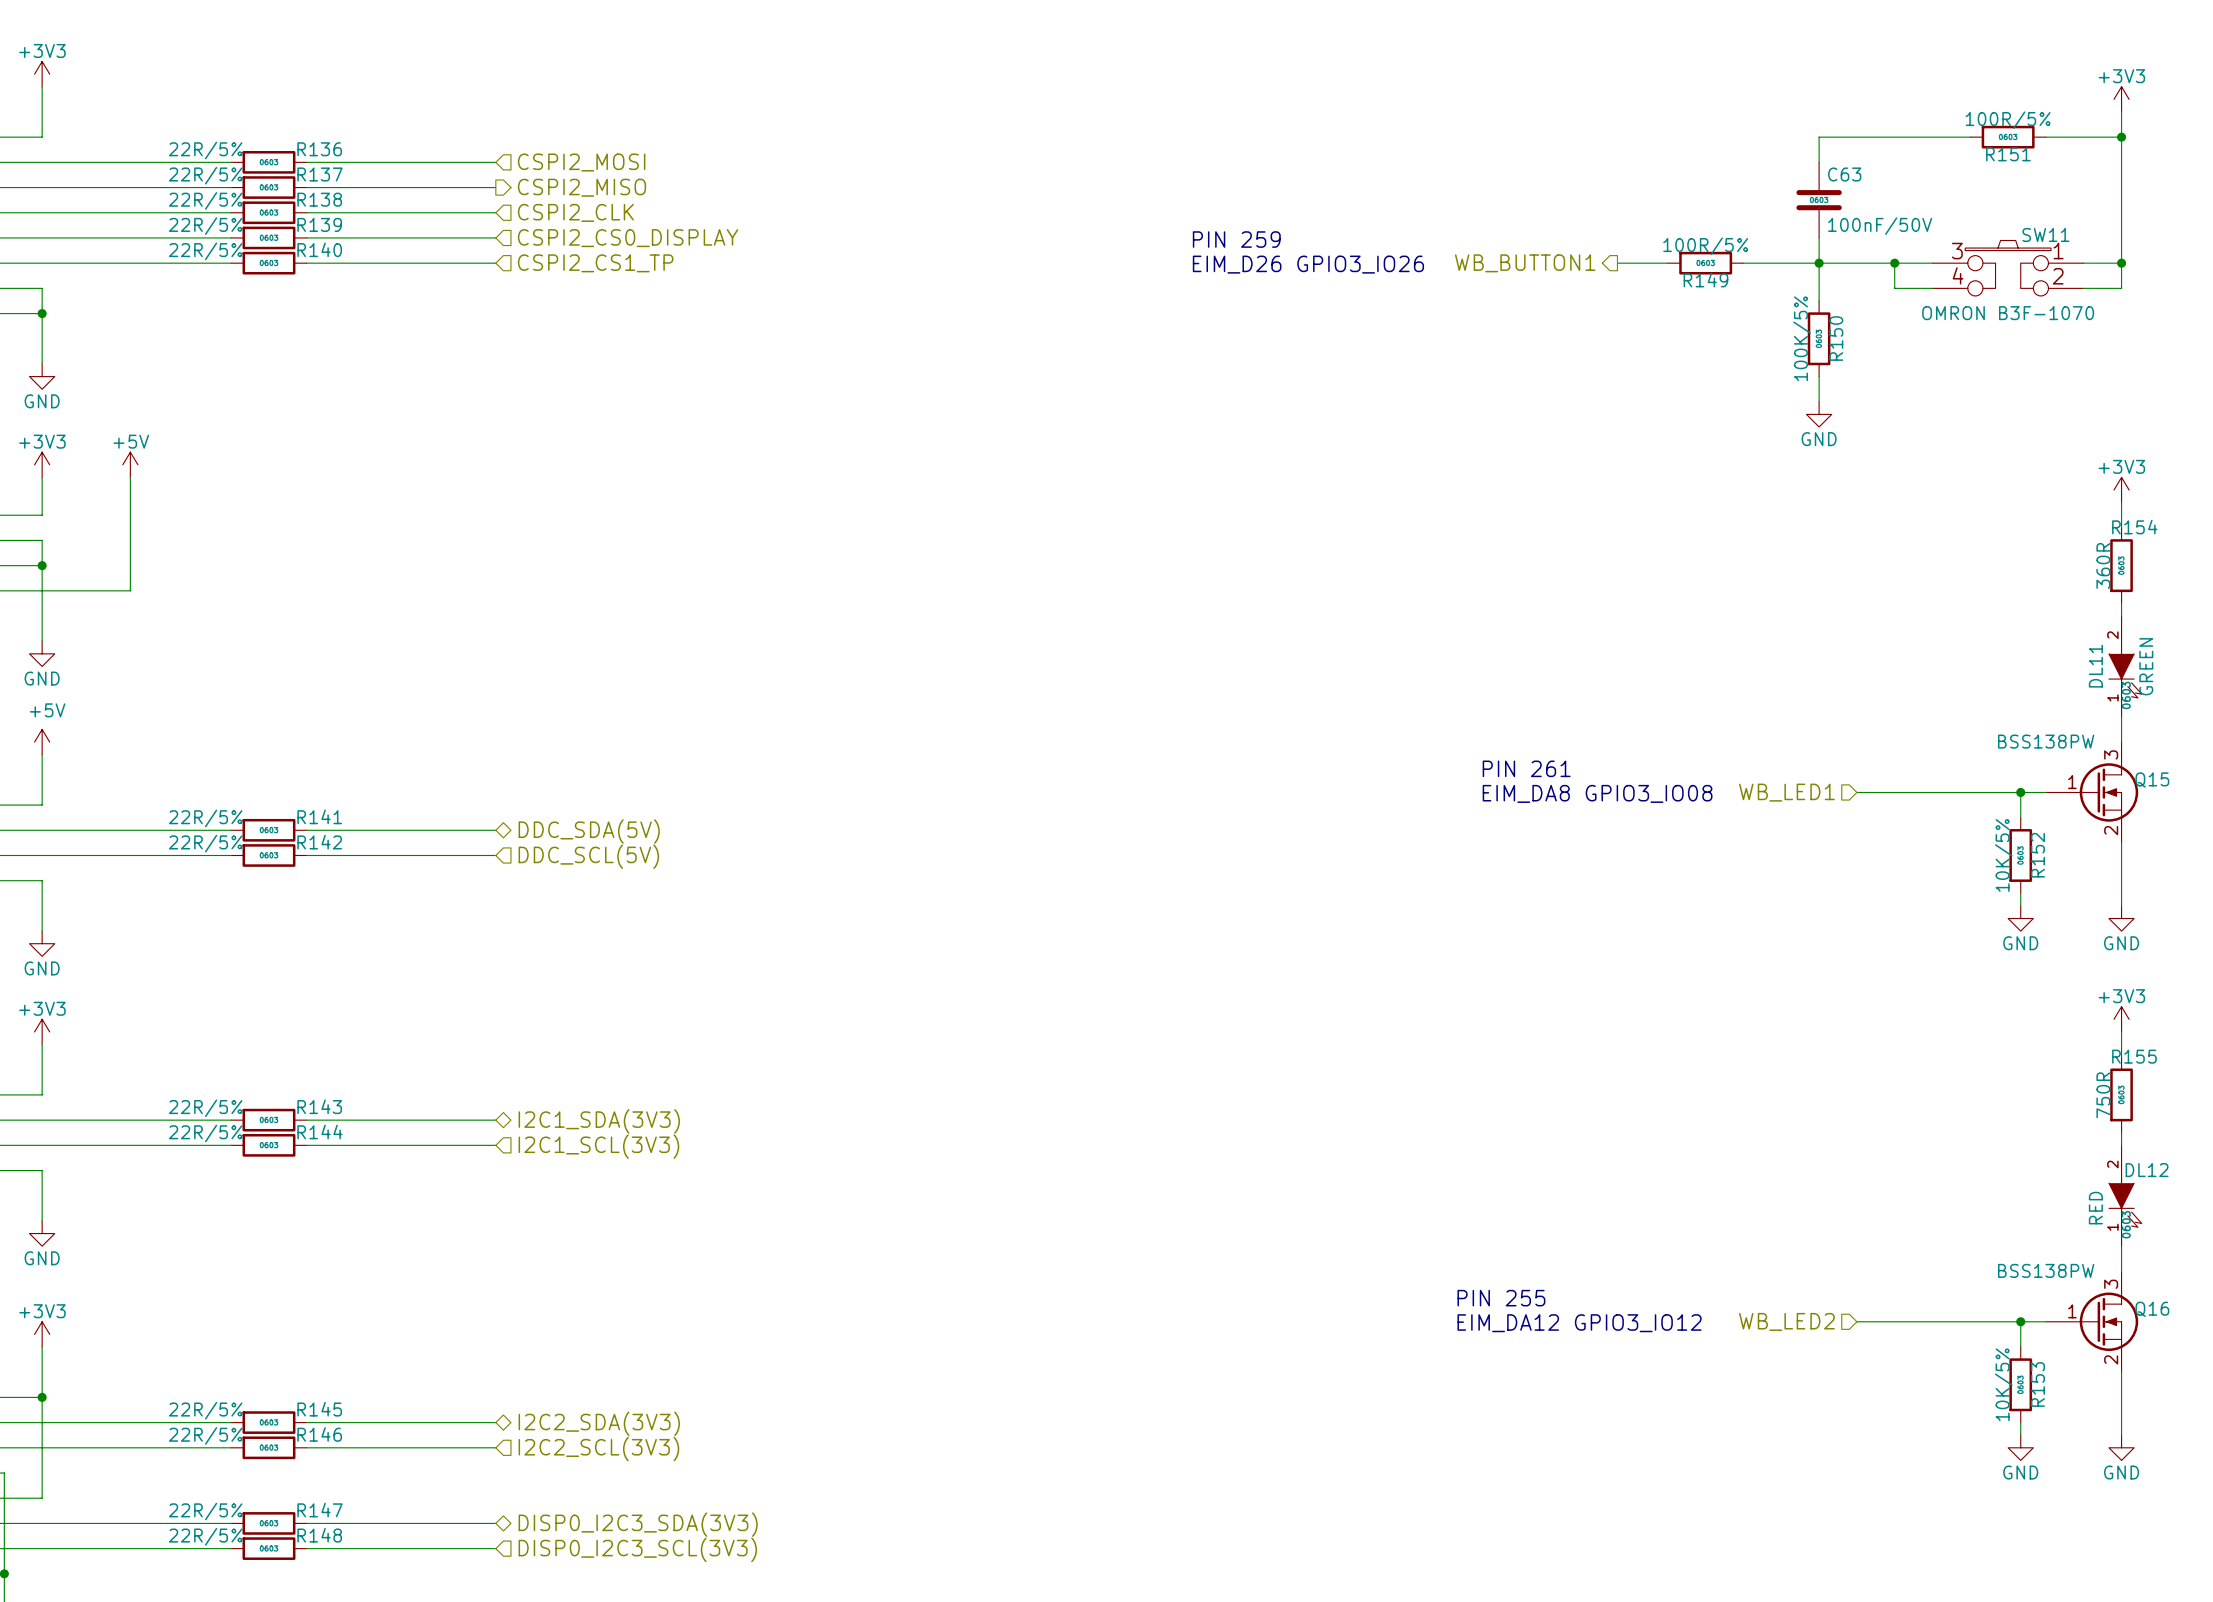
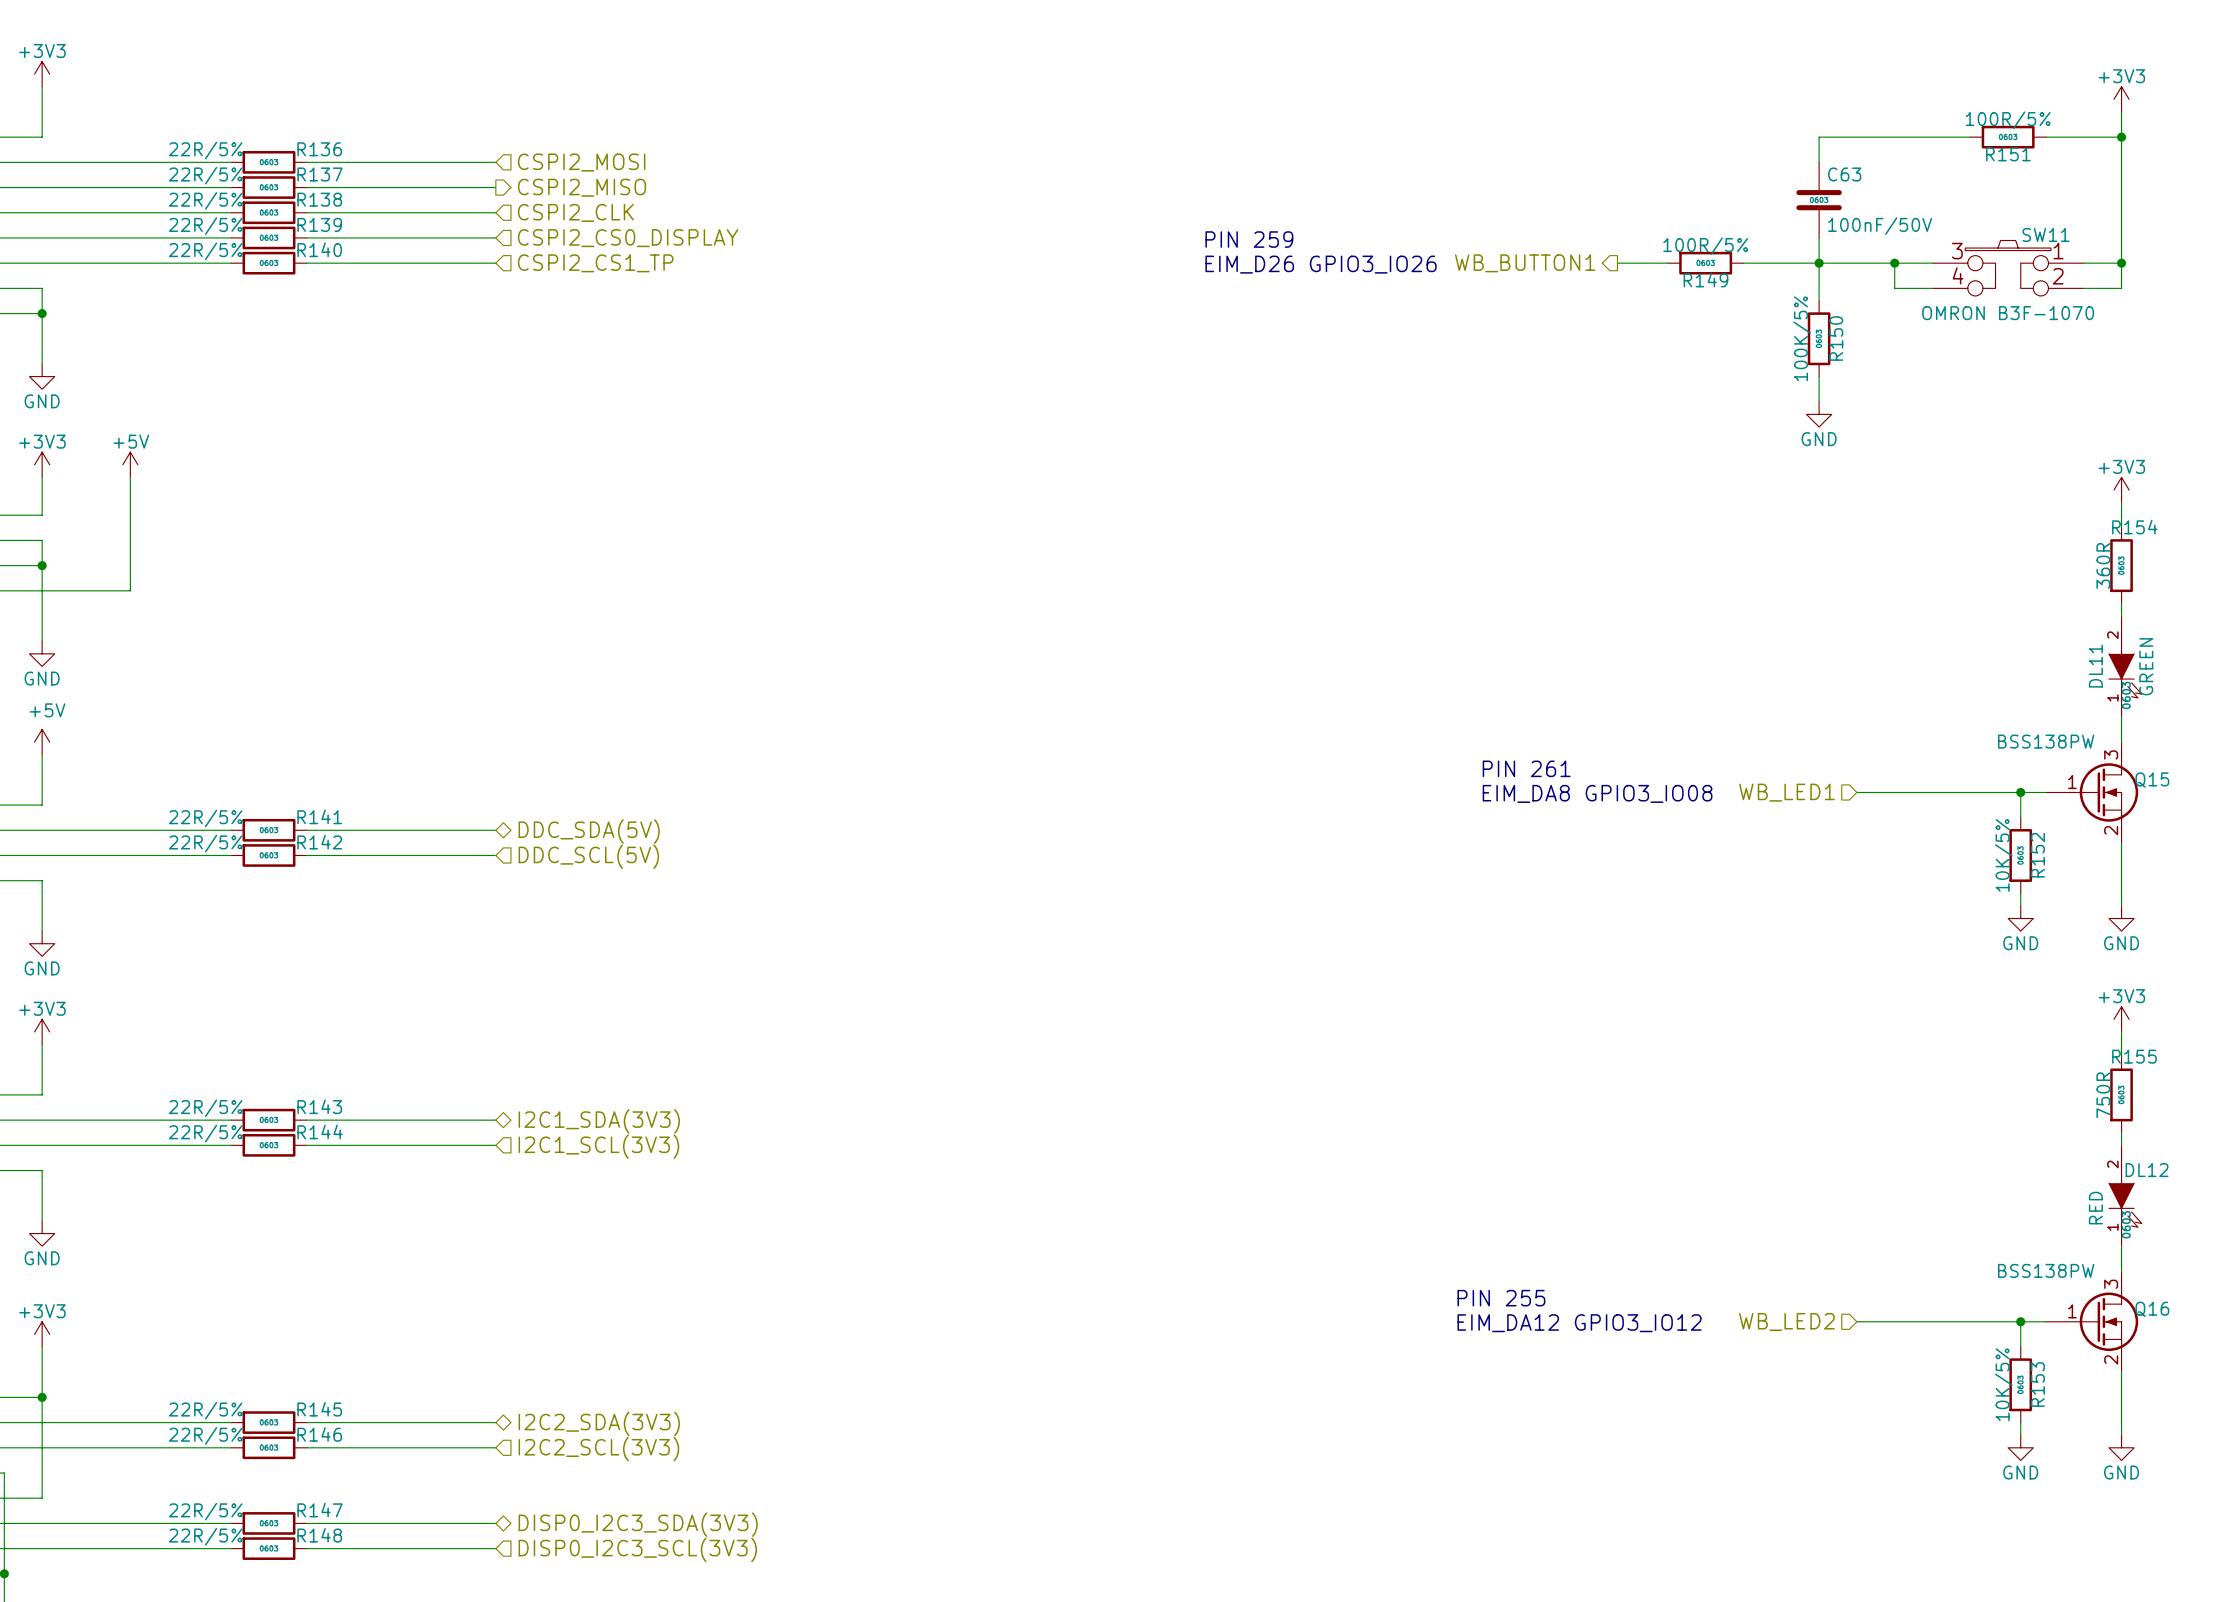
text position: PIN 259 (1236, 239) -> PIN 259 (1249, 239)
text position: EIM_D26 GPIO3_IO26 (1308, 264) -> EIM_D26 GPIO3_IO26 (1321, 264)

